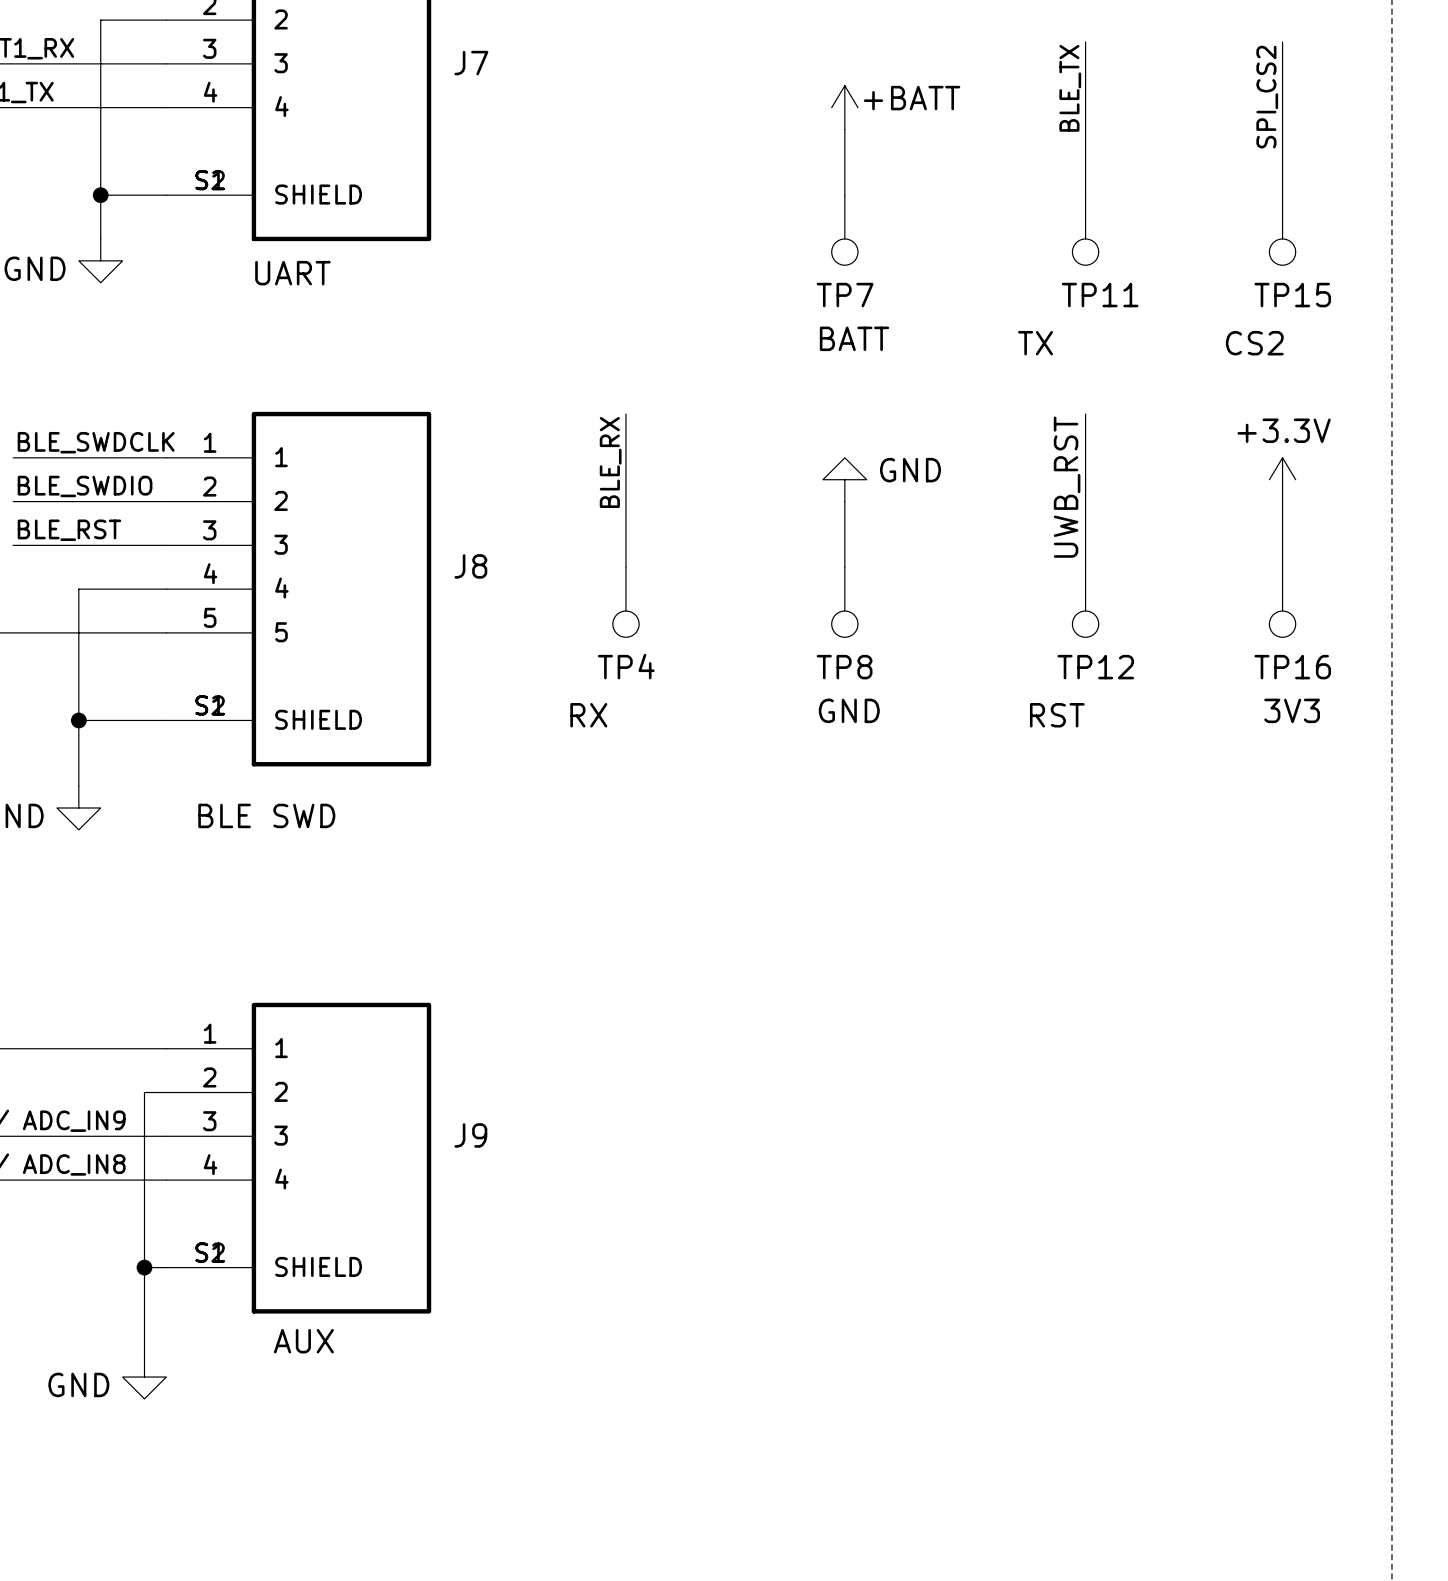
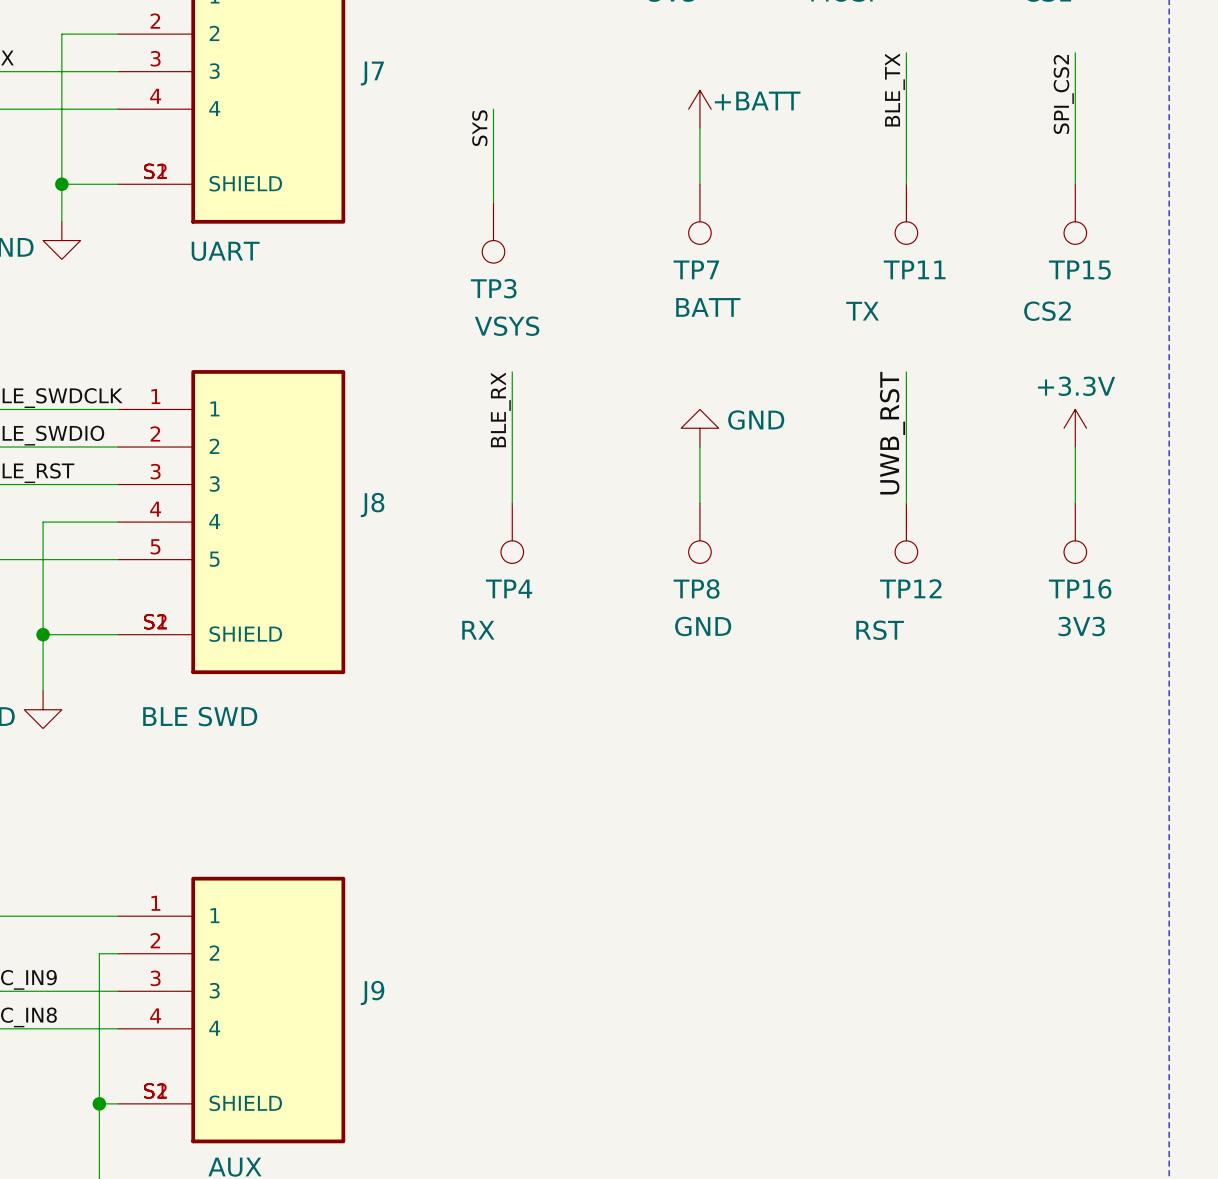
wire: none -> (493, 109) (493, 203)
label: none -> SYS (479, 128)
TP3: none -> VSYS (493, 233)

